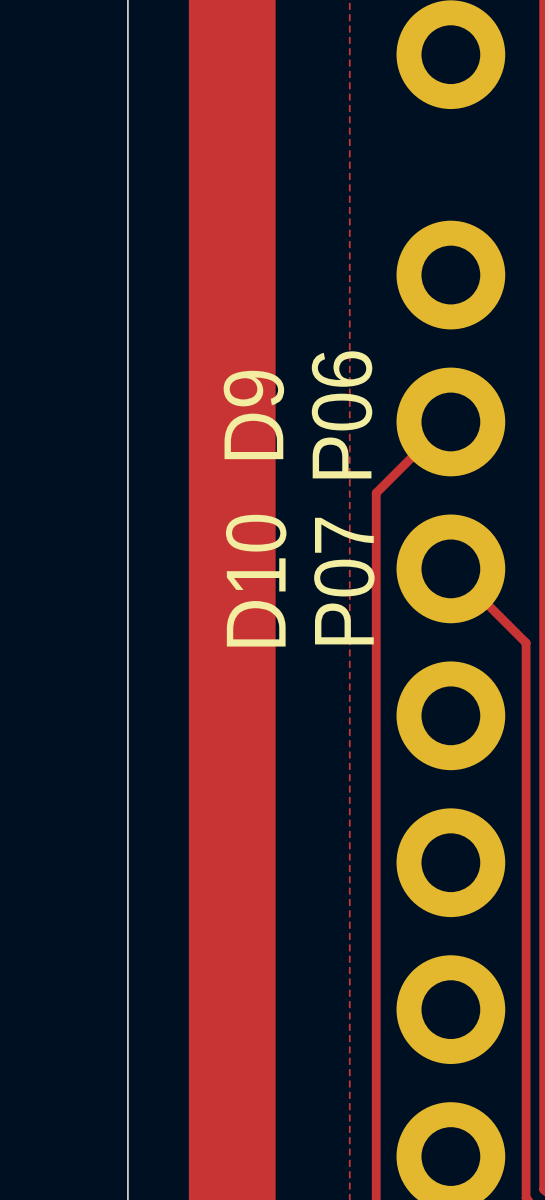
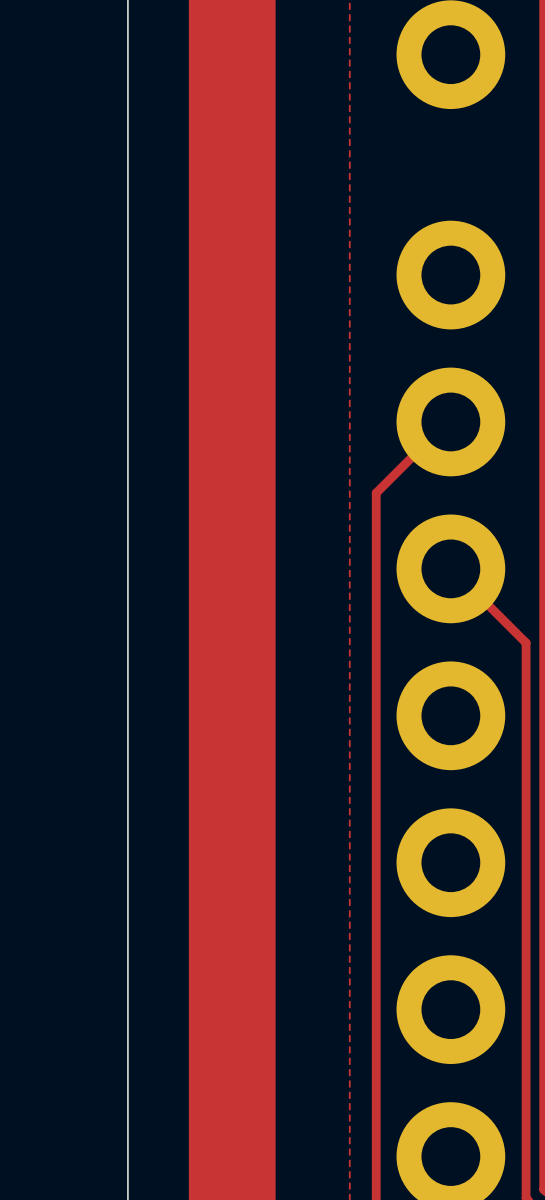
text: P06 (342, 414) -> none
text: D9 (253, 415) -> none
text: D10 (256, 580) -> none
text: P07 (344, 581) -> none

